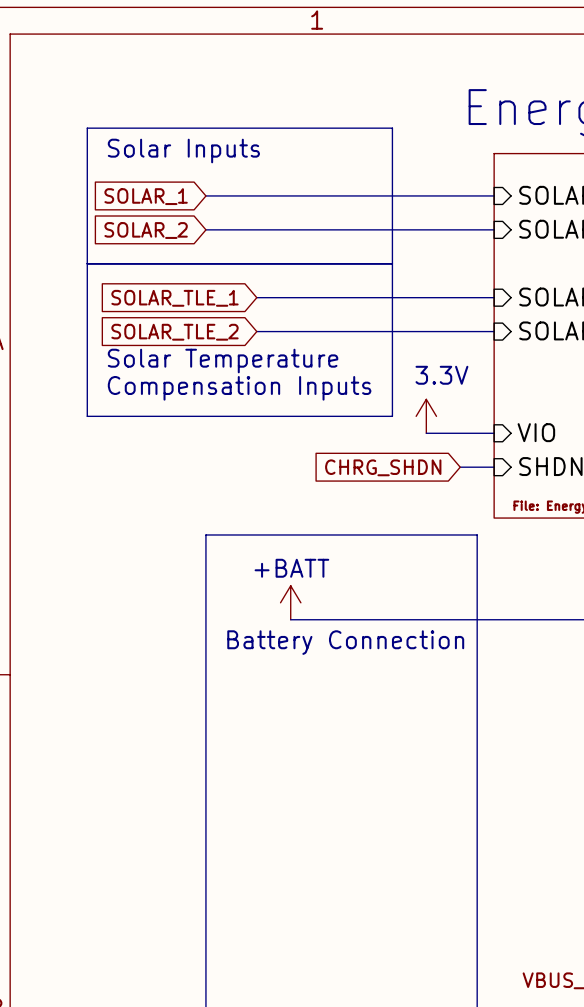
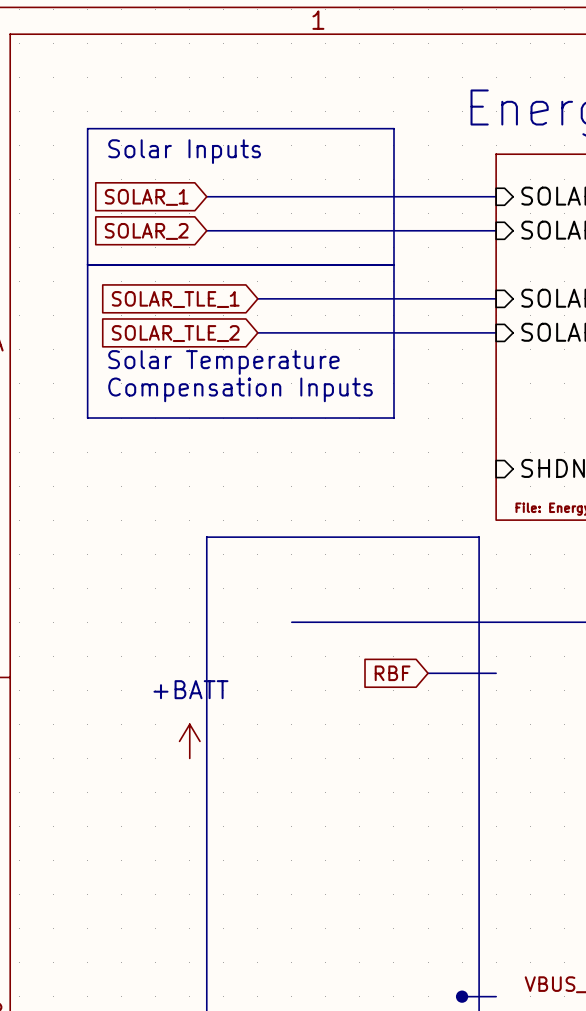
power symbol: 3.3V (426, 416) -> none
sheet pin: VIO (536, 432) -> none
wire: (426, 433) (494, 433) -> (428, 673) (496, 673)
global label: CHRG_SHDN (383, 467) -> none
wire: (460, 467) (494, 467) -> none
power symbol text position: +BATT (291, 568) -> +BATT (190, 689)
power symbol position: +BATT (290, 602) -> +BATT (189, 741)
text: Battery Connection (345, 642) -> none
global label: none -> RBF (392, 673)
wire: none -> (462, 996) (496, 996)
junction: none -> (462, 996)

